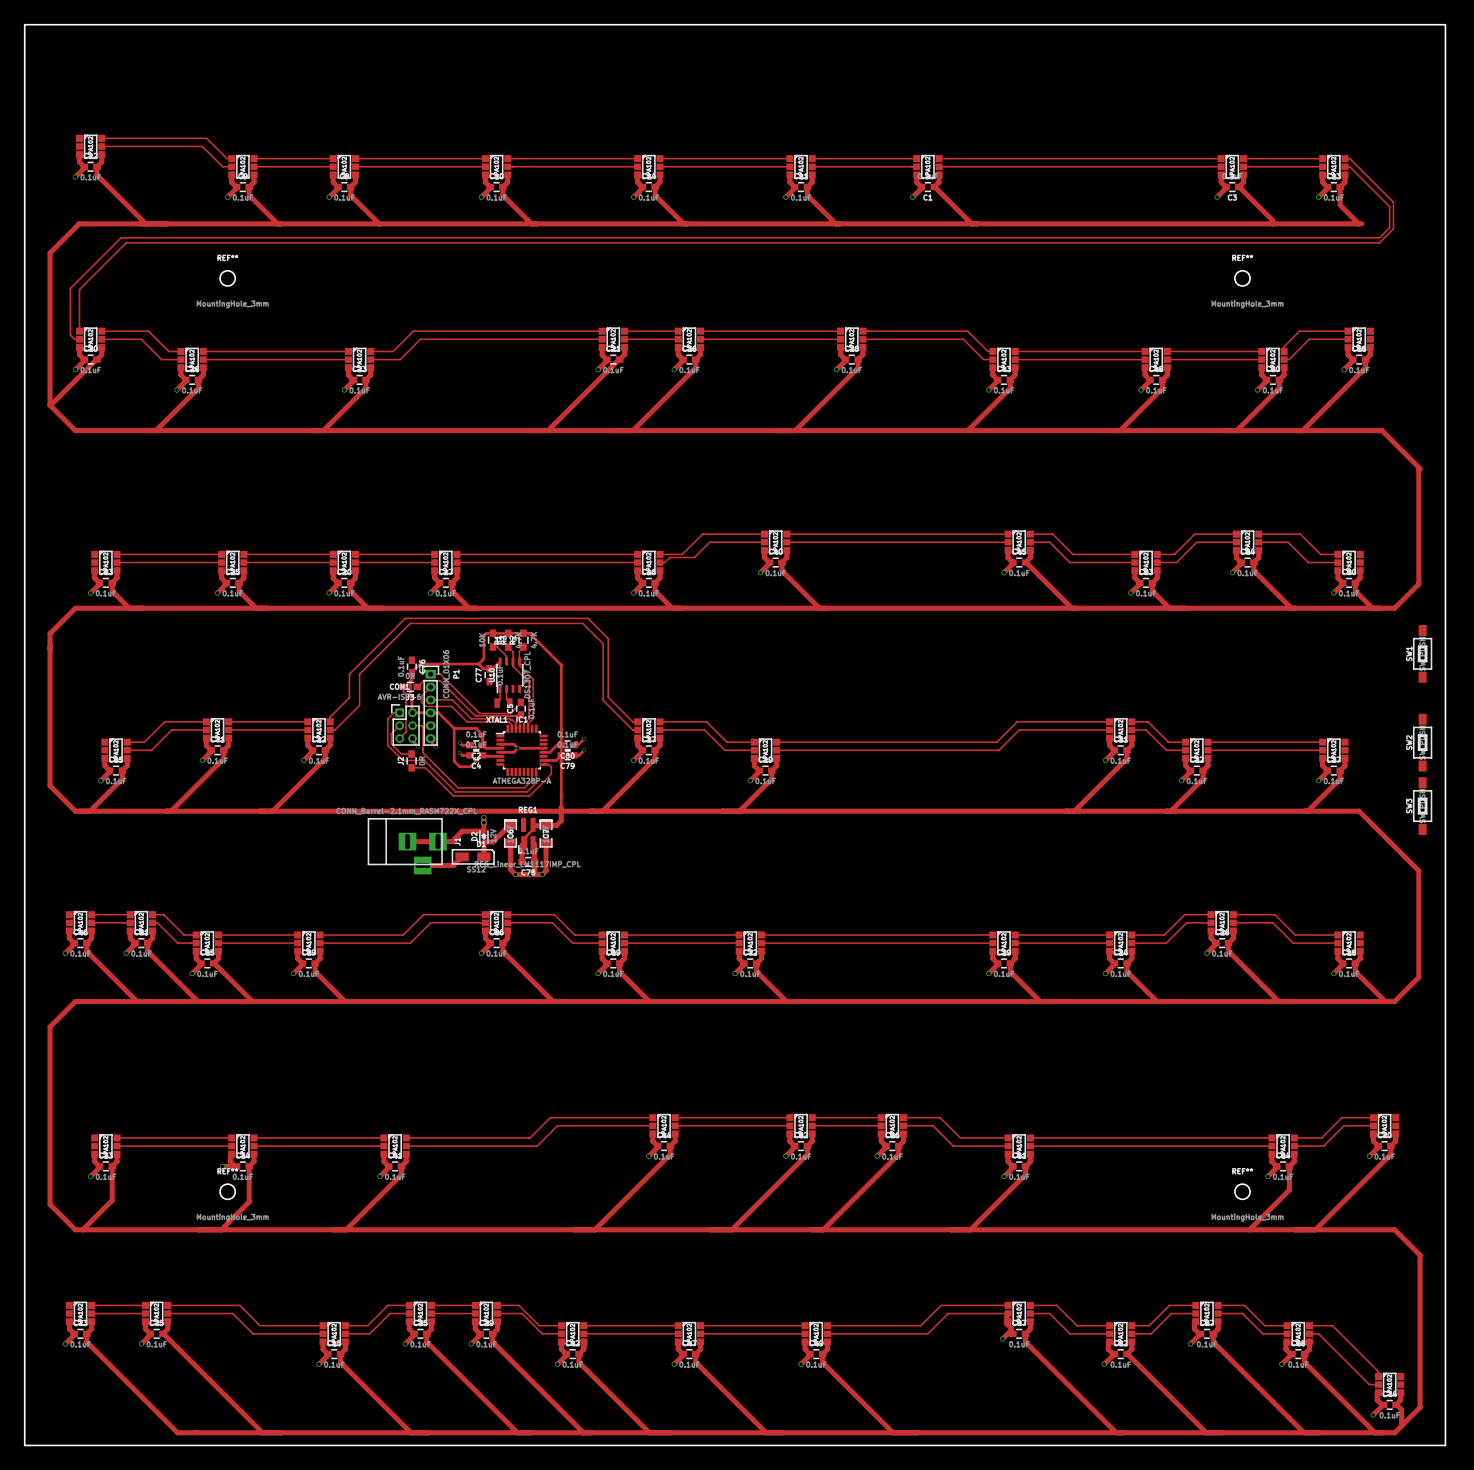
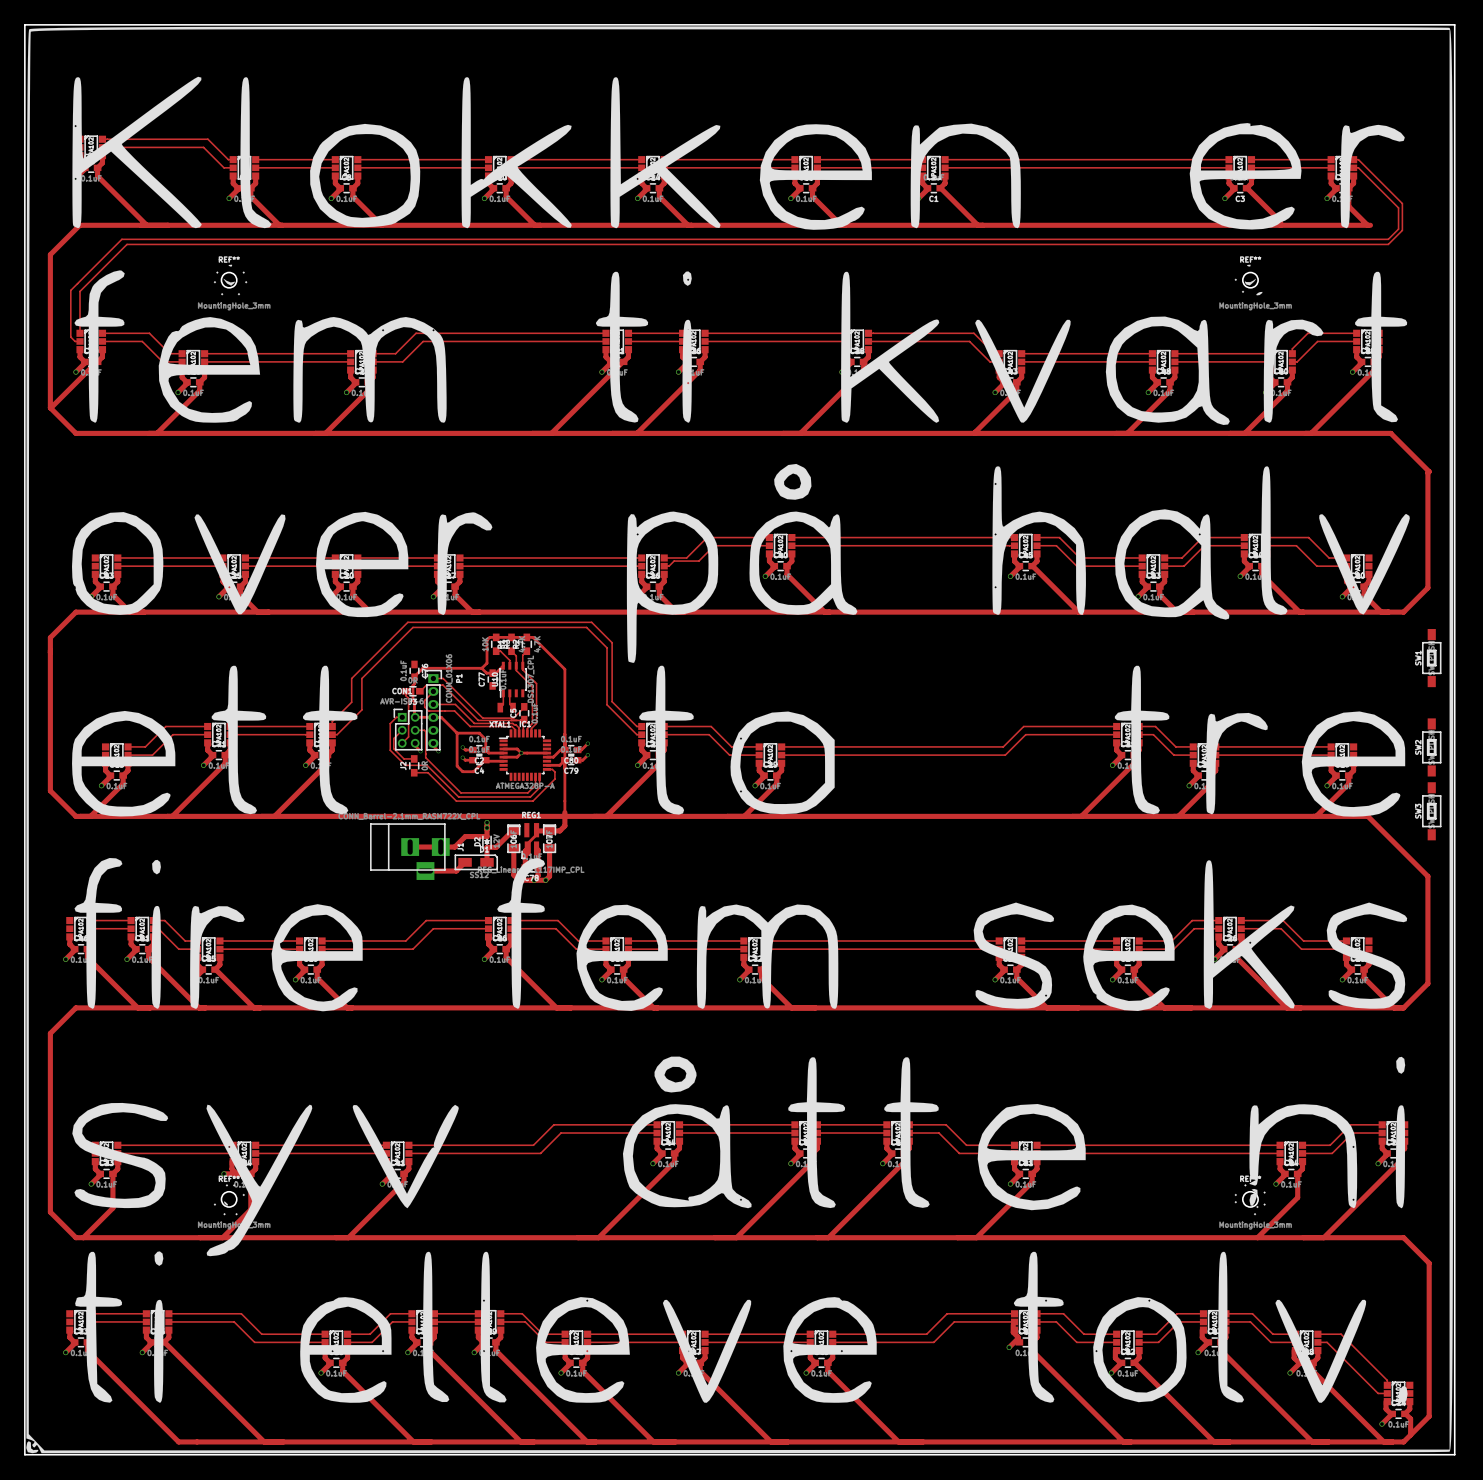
drawing: none -> [26, 26, 1454, 1454]

